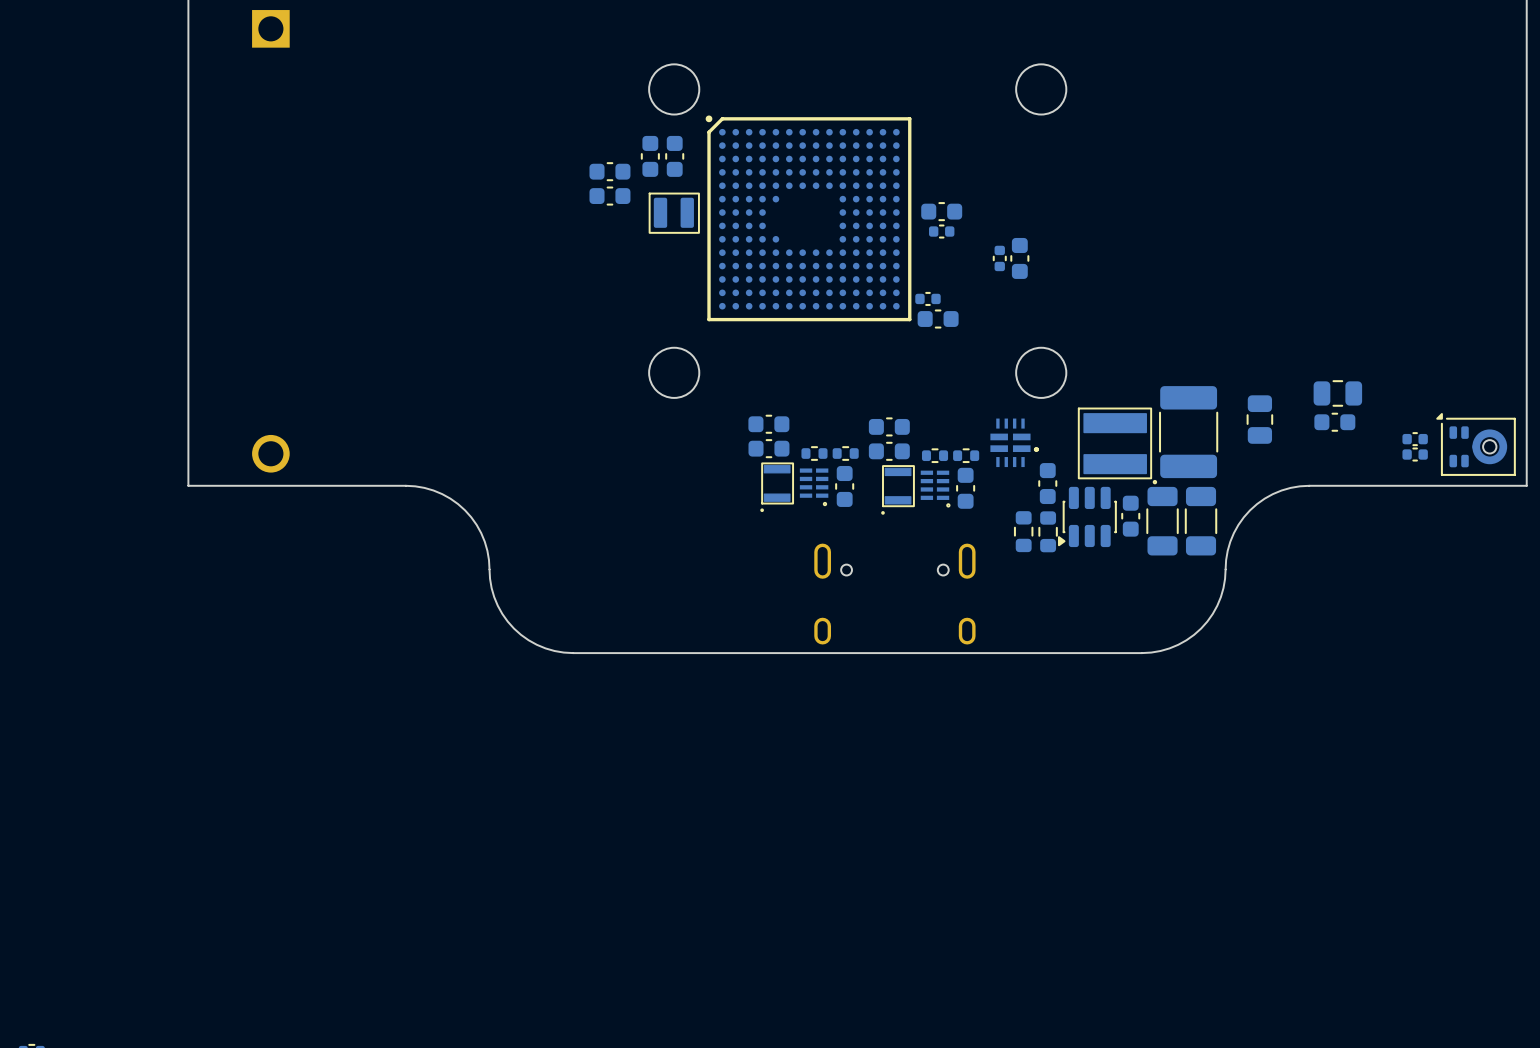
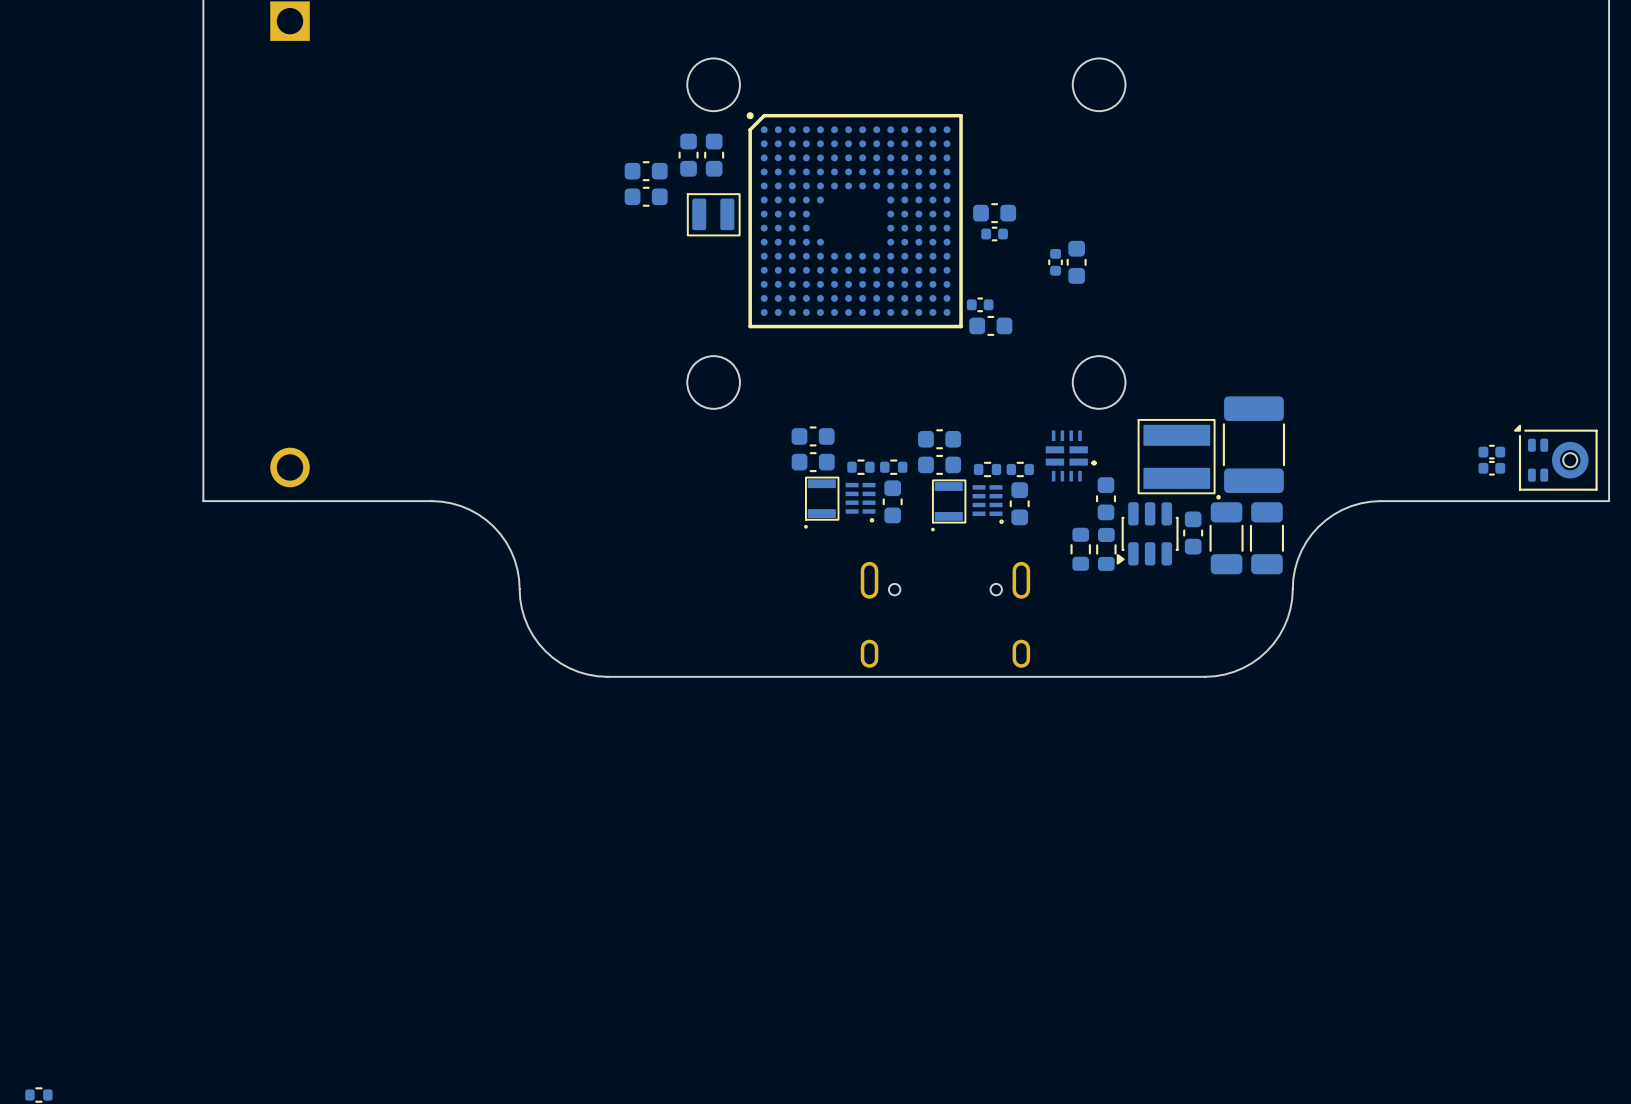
part: (1337, 393) -> none
part: (1259, 419) -> none
part: (1334, 422) -> none

